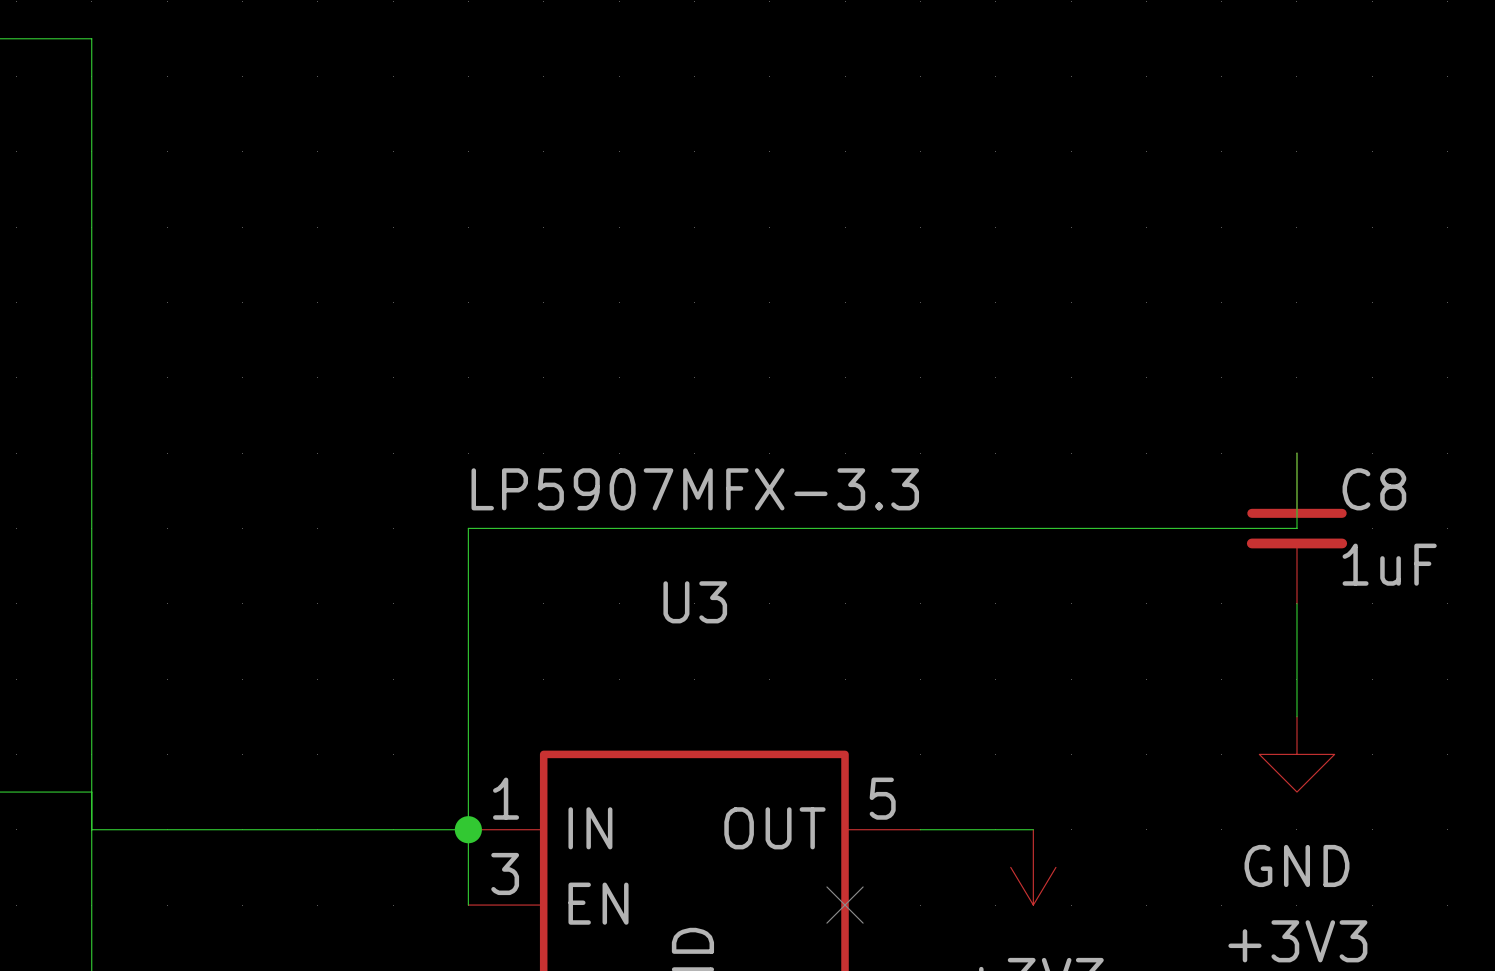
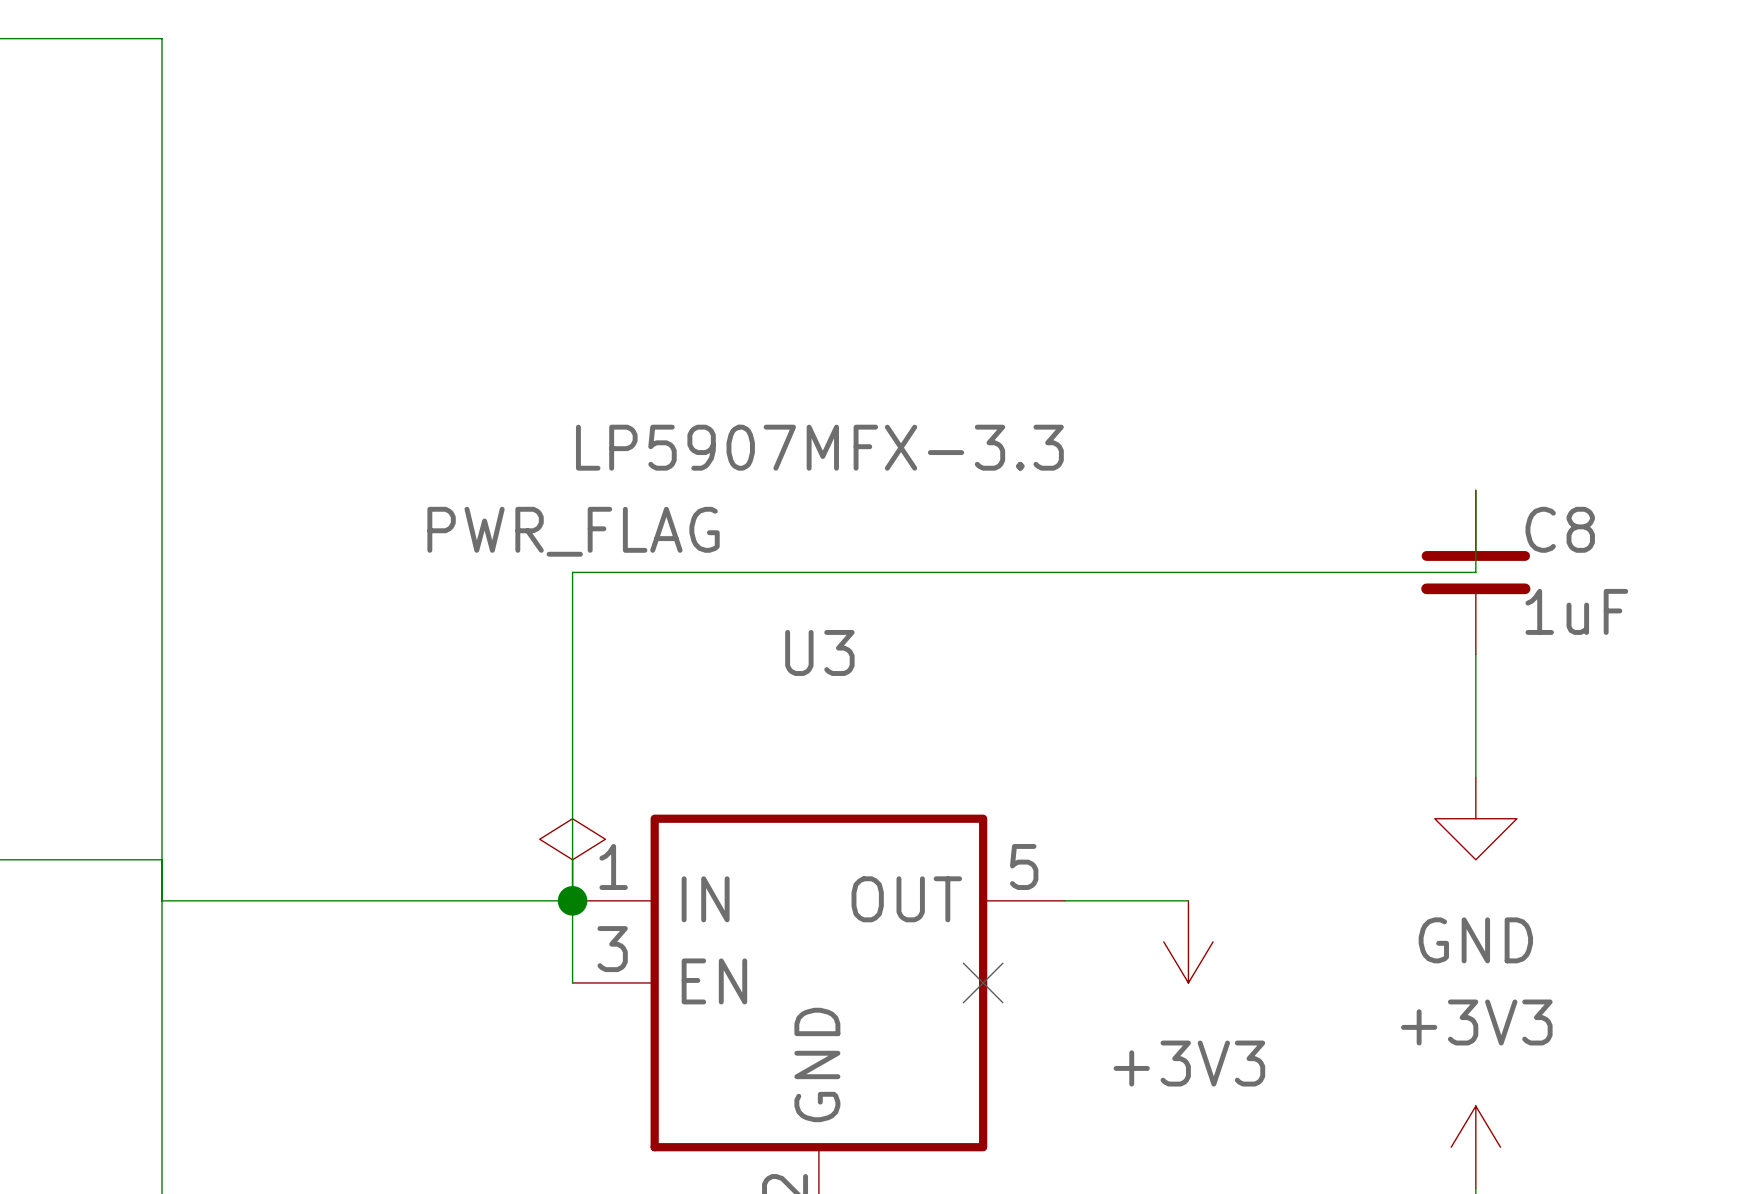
U3 value position: LP5907MFX-3.3 (695, 489) -> LP5907MFX-3.3 (819, 447)
power symbol: none -> PWR_FLAG (572, 859)

